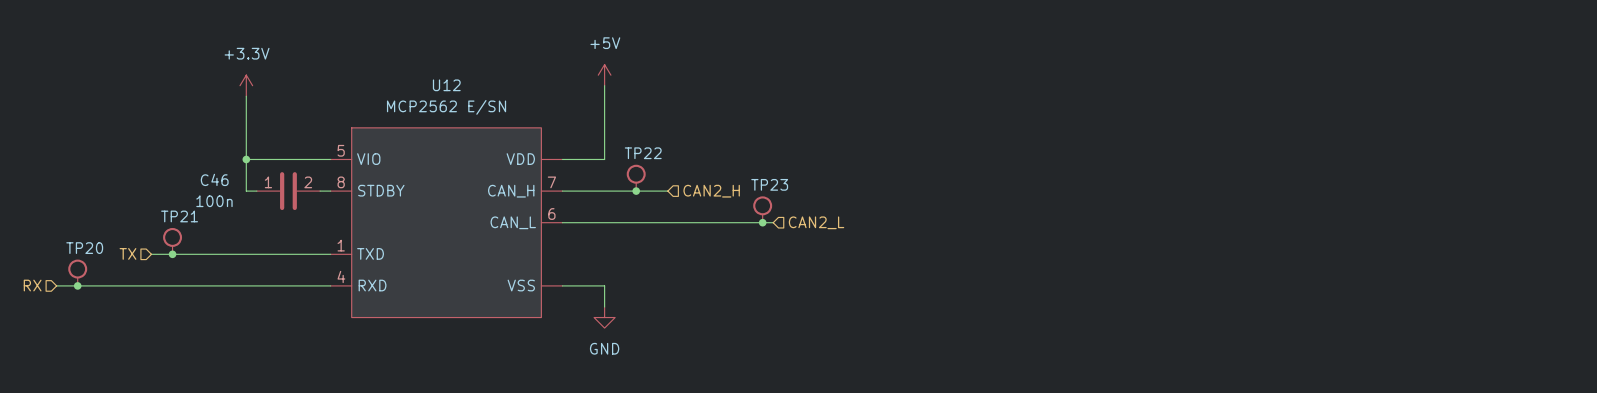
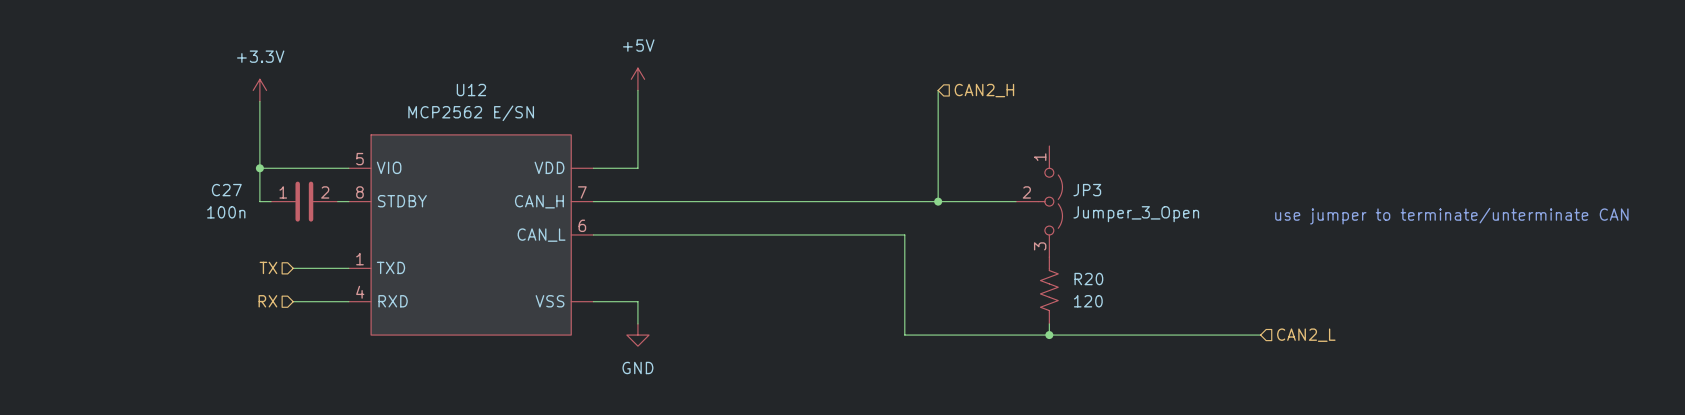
wire: none -> (938, 90) (938, 201)
hierarchical label: none -> CAN2_H (984, 90)
TP22: (636, 177) -> none
C46 name: C46 (214, 179) -> C27 (226, 190)
junction: (636, 191) -> none
wire: none -> (704, 201) (1015, 201)
hierarchical label: CAN2_H (711, 191) -> none
junction: none -> (938, 201)
JP3: none -> Jumper_3_Open (1039, 201)
text: none -> use jumper to terminate/unterminate CAN (1451, 216)
TP23: (762, 209) -> none
junction: (762, 222) -> none
wire: none -> (815, 234) (904, 234) (904, 335) (1260, 335)
hierarchical label: CAN2_L (816, 222) -> none
TP21: (172, 241) -> none
hierarchical label position: TX (127, 253) -> TX (268, 267)
wire: (151, 254) (277, 254) -> none
junction: (172, 254) -> none
TP20: (77, 272) -> none
R20: none -> 120 (1049, 290)
hierarchical label: RX (32, 285) -> none
wire: (56, 285) (277, 285) -> none
junction: (77, 285) -> none
hierarchical label: none -> RX (267, 301)
wire: none -> (1049, 323) (1049, 335)
junction: none -> (1049, 335)
hierarchical label: none -> CAN2_L (1306, 335)

